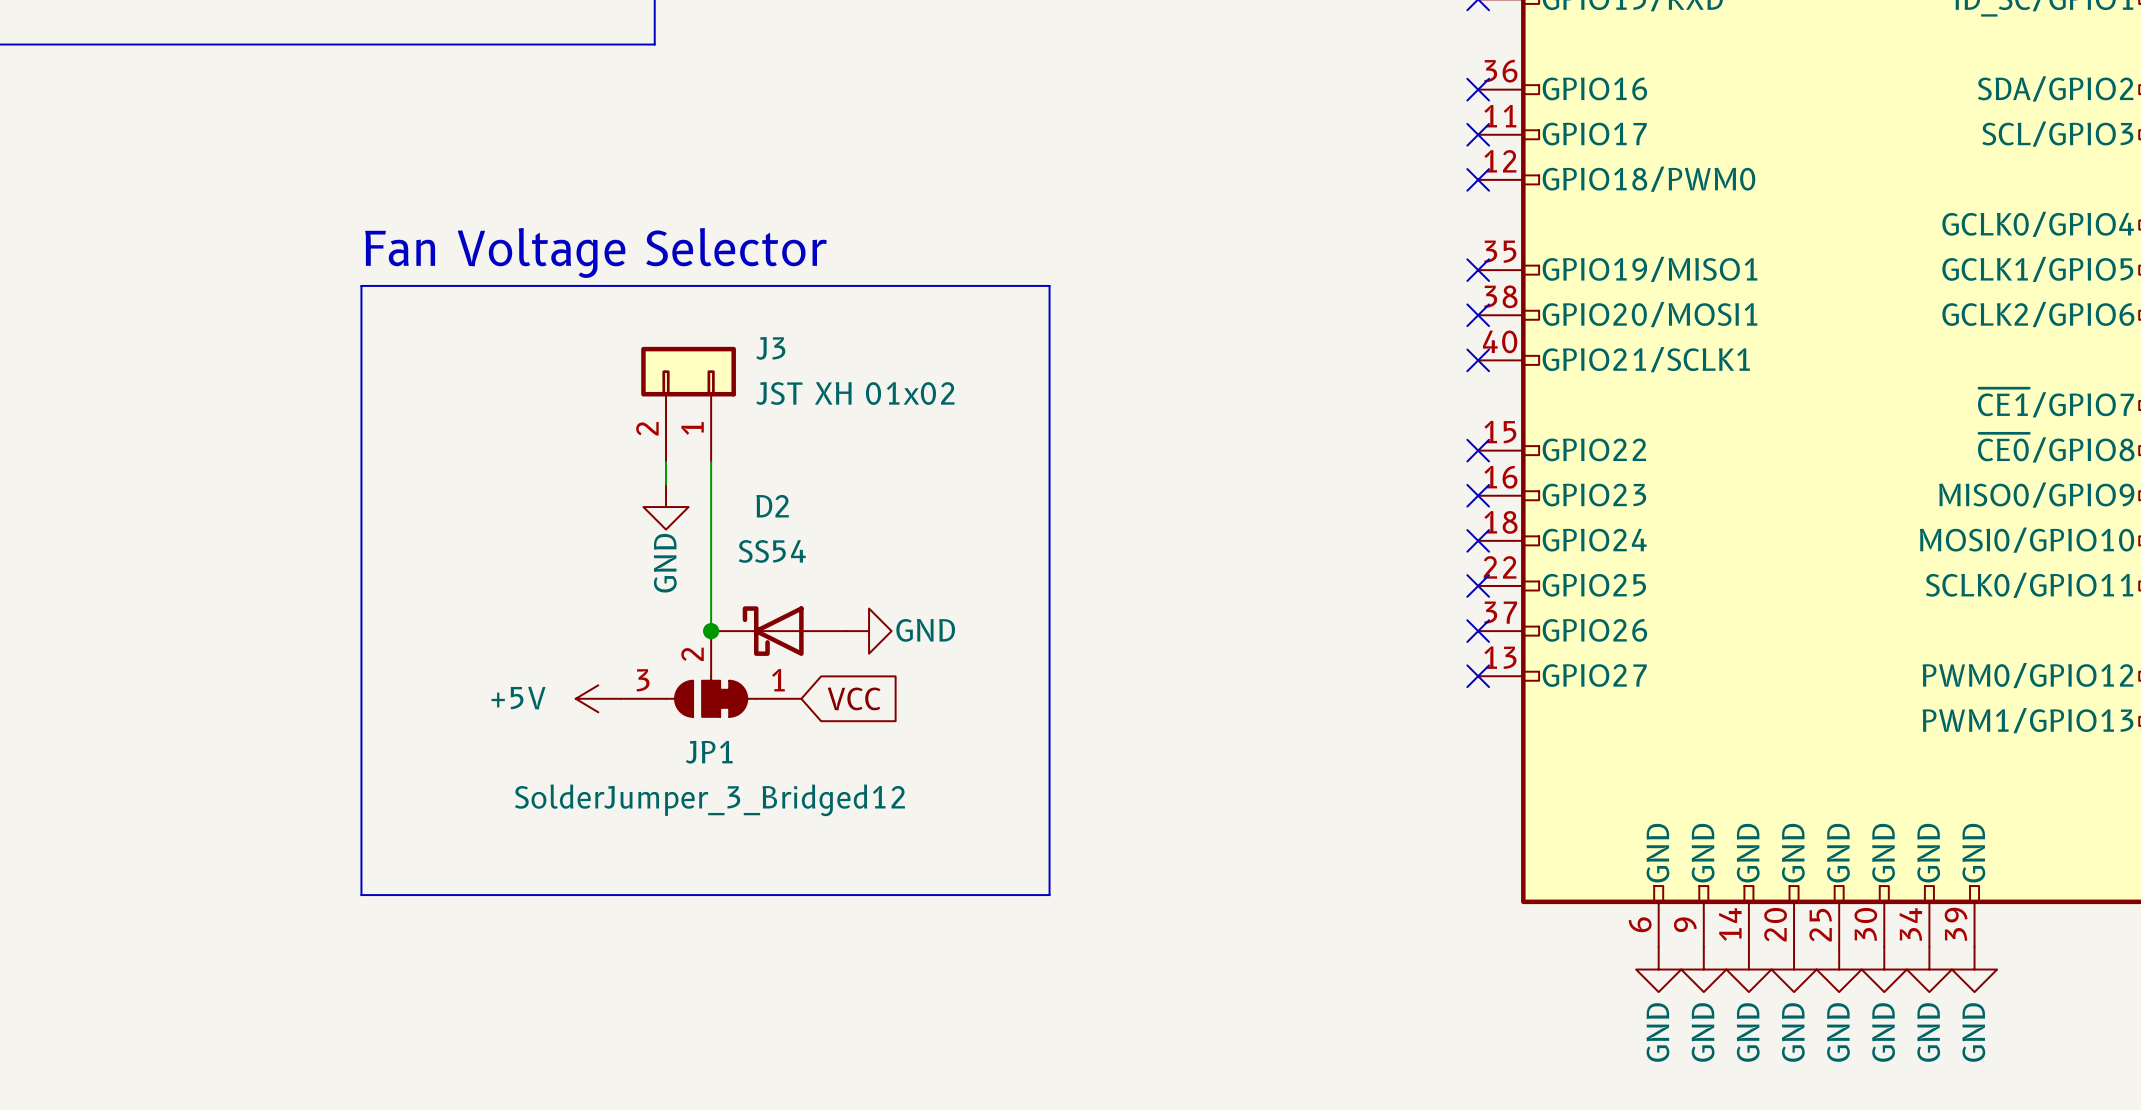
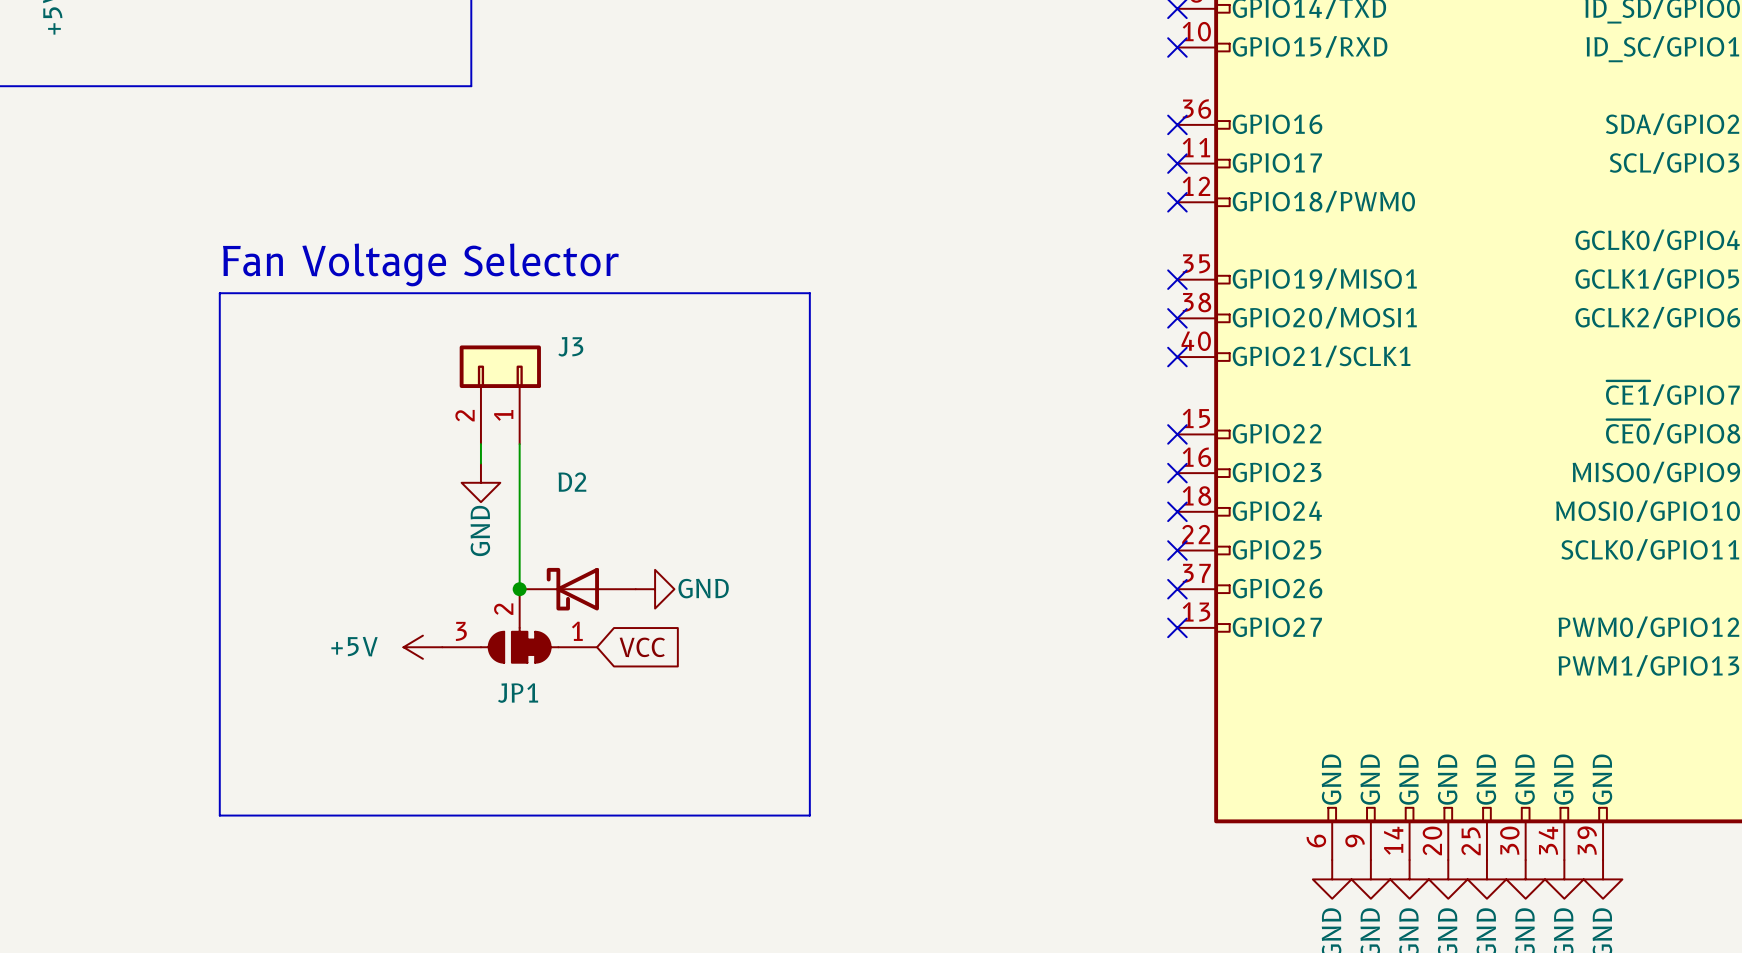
J3 value: JST XH 01x02 (855, 393) -> none
D2 value: SS54 (772, 551) -> none
JP1 value: SolderJumper_3_Bridged12 (709, 800) -> none

